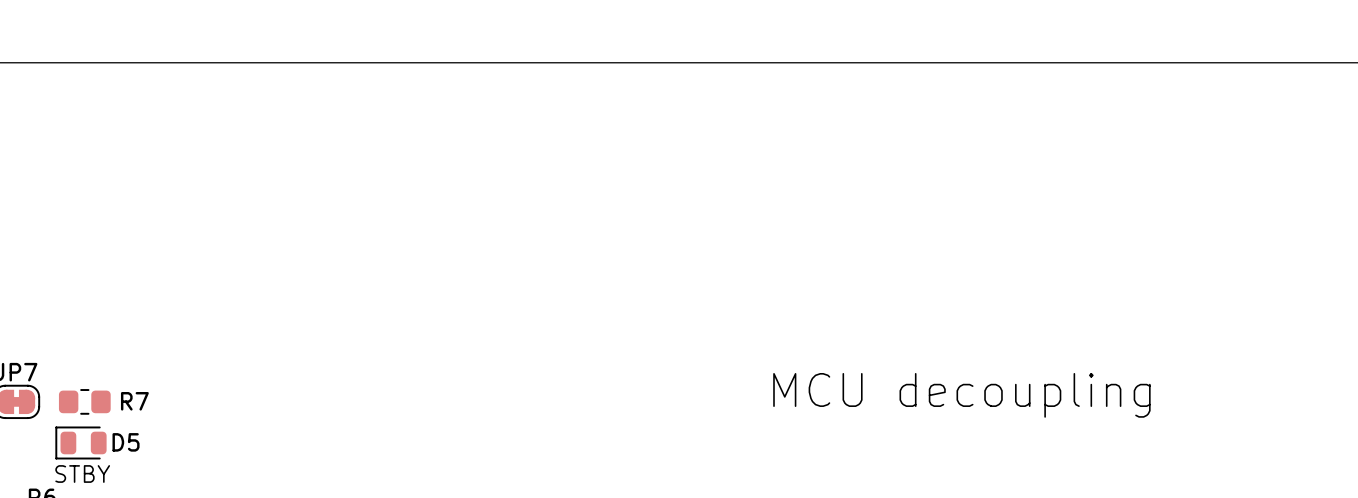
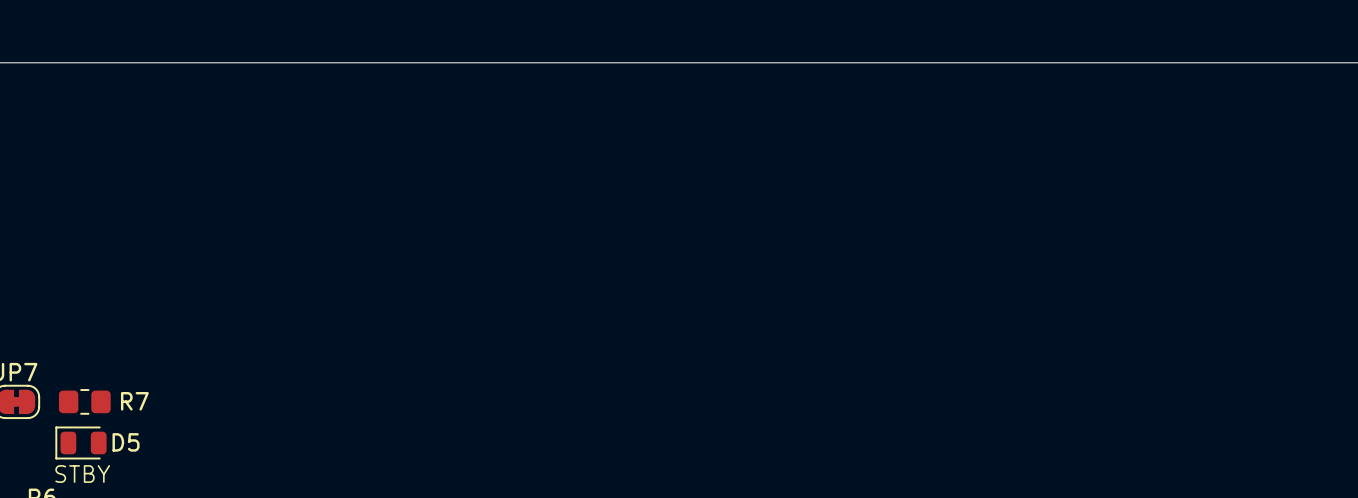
text: MCU decoupling (961, 395) -> none

